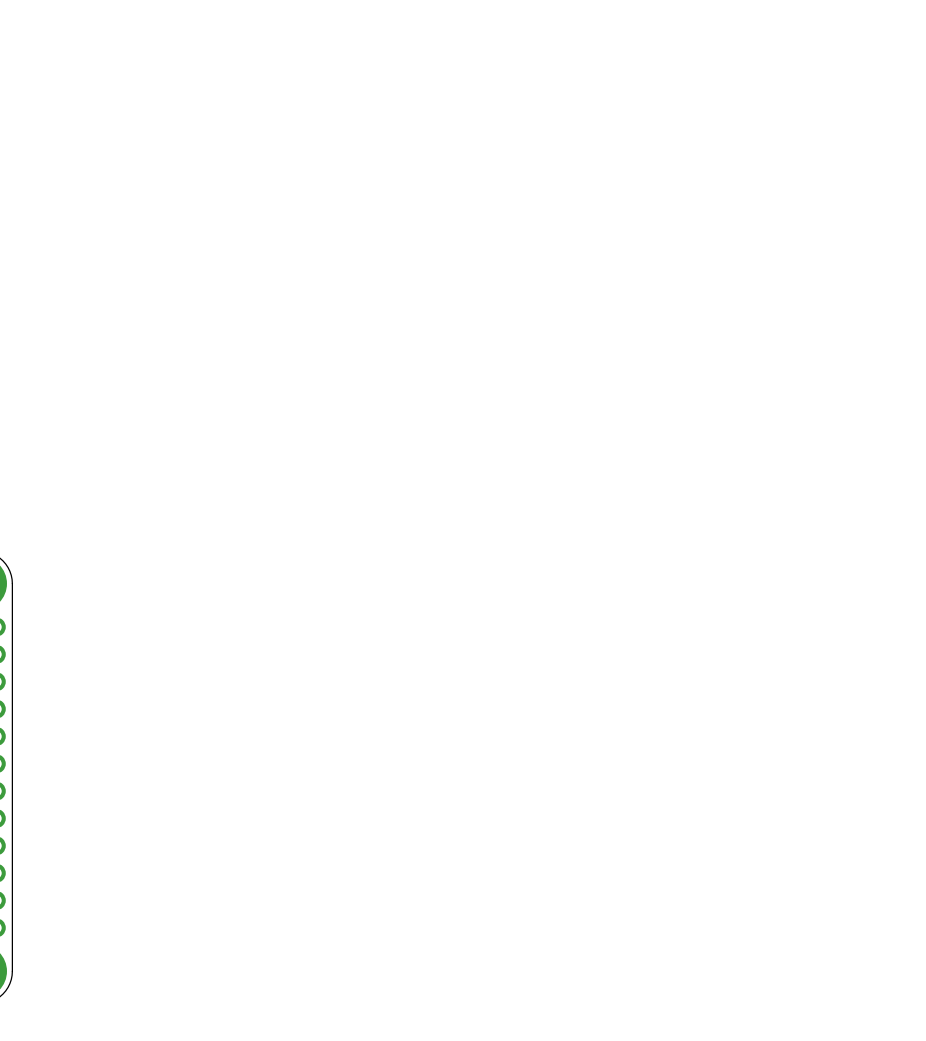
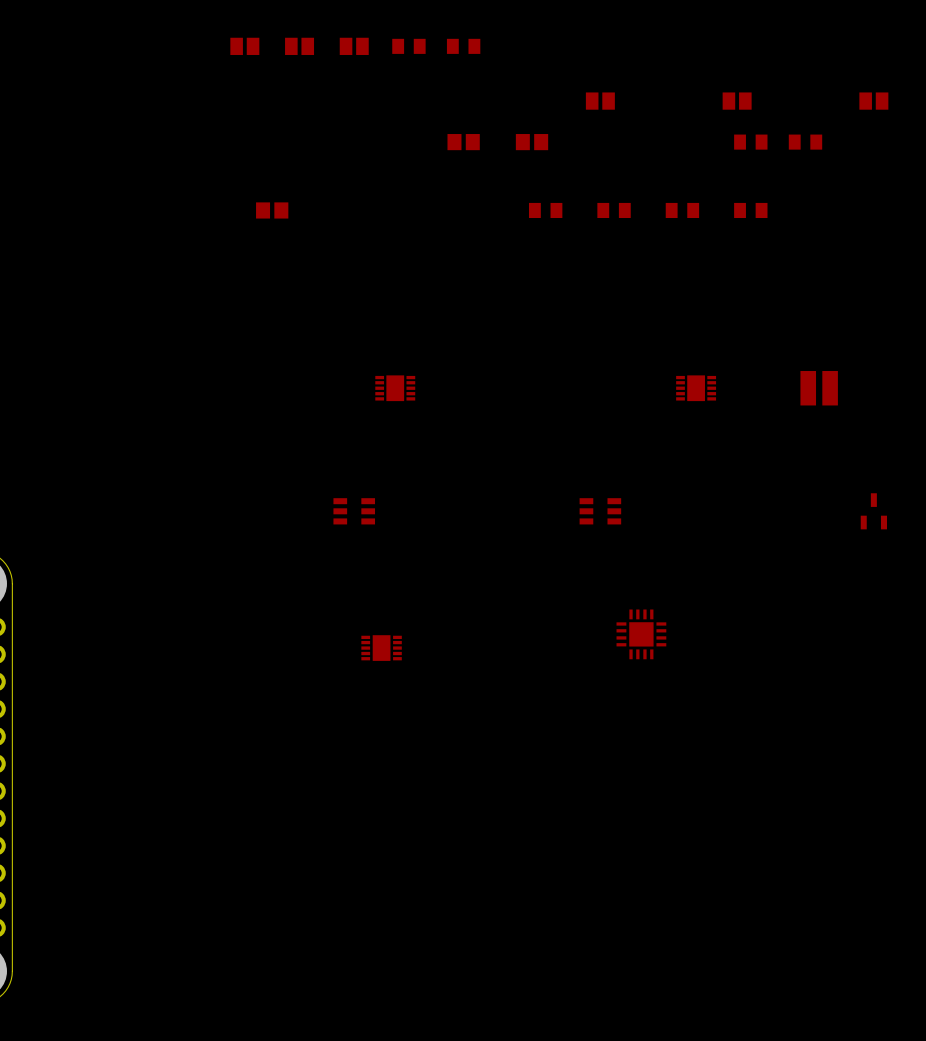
part: none -> (244, 46)
part: none -> (299, 46)
part: none -> (354, 46)
part: none -> (408, 46)
part: none -> (463, 46)
part: none -> (600, 101)
part: none -> (737, 101)
part: none -> (873, 101)
part: none -> (463, 142)
part: none -> (532, 142)
part: none -> (750, 142)
part: none -> (805, 142)
part: none -> (272, 210)
part: none -> (545, 210)
part: none -> (614, 210)
part: none -> (682, 210)
part: none -> (750, 210)
part: none -> (395, 388)
part: none -> (696, 388)
part: none -> (819, 388)
part: none -> (354, 511)
part: none -> (600, 511)
part: none -> (873, 511)
part: none -> (641, 634)
part: none -> (381, 648)

